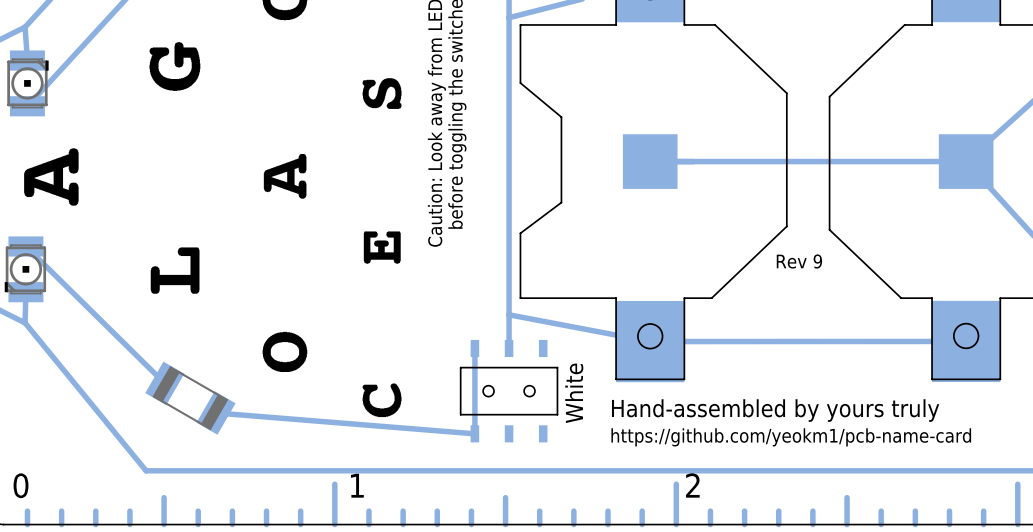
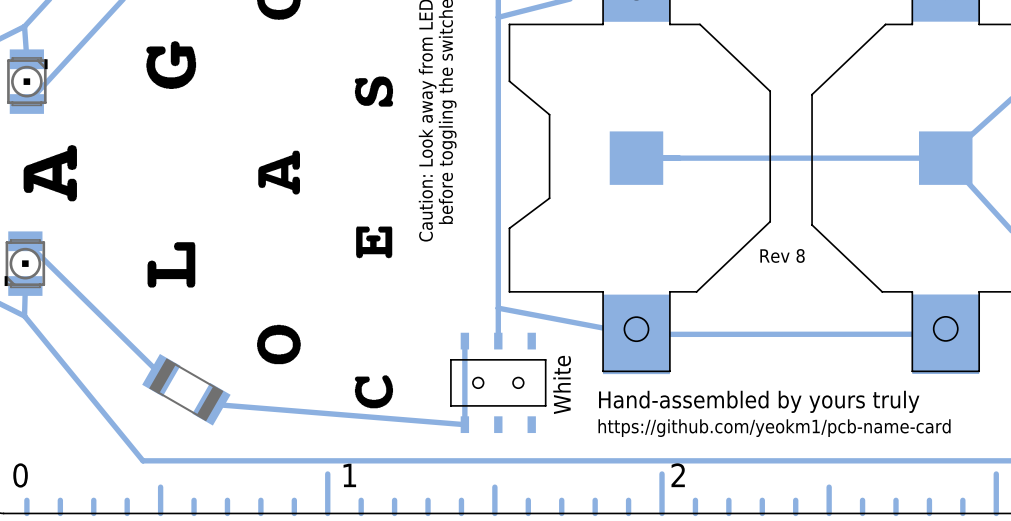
text: Rev 9 (799, 261) -> Rev 8 (782, 255)

